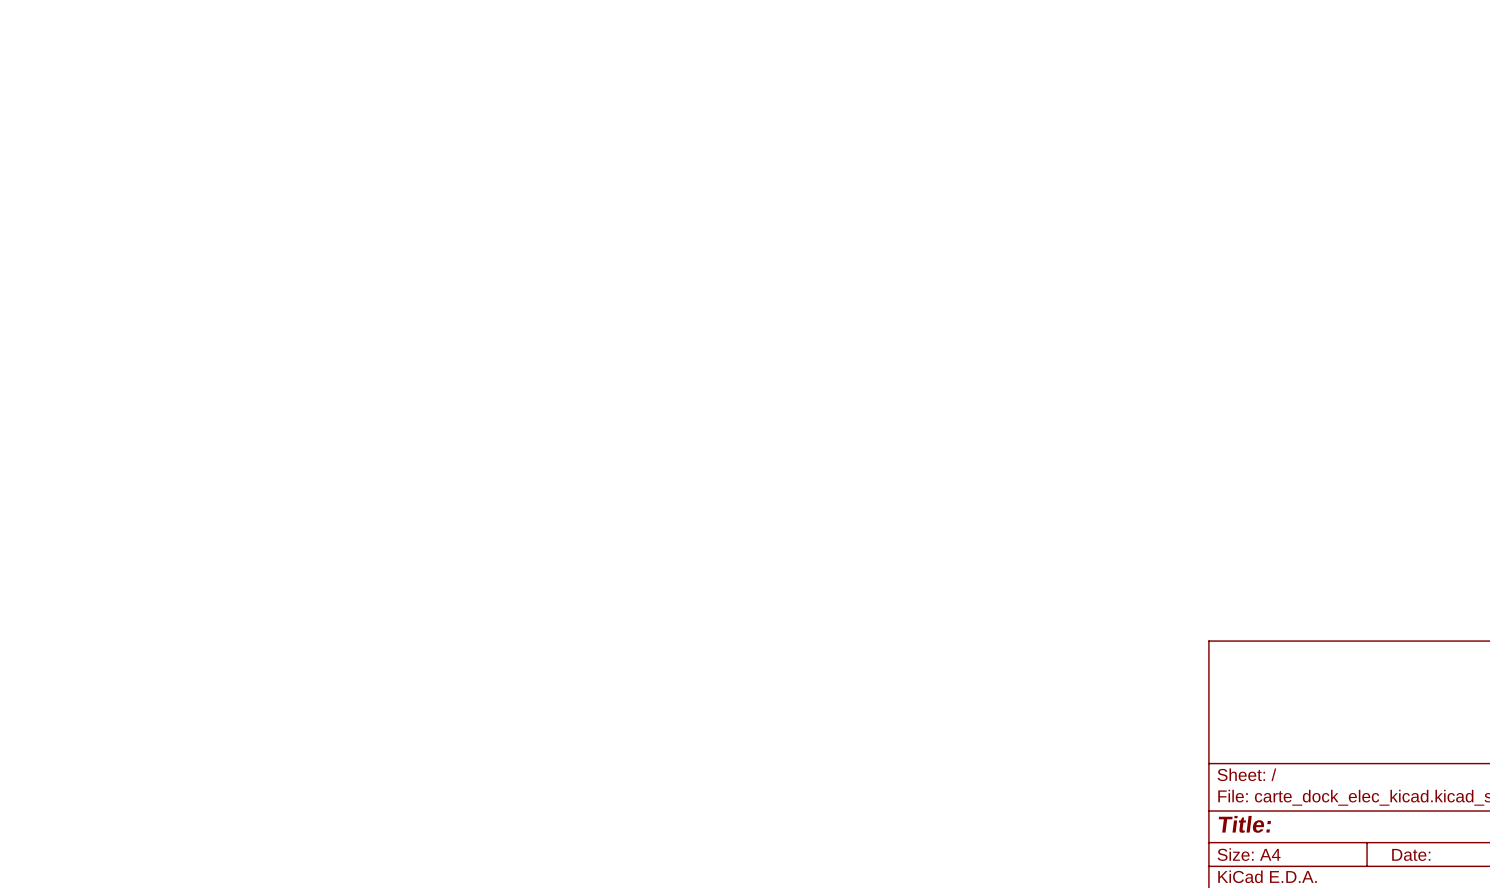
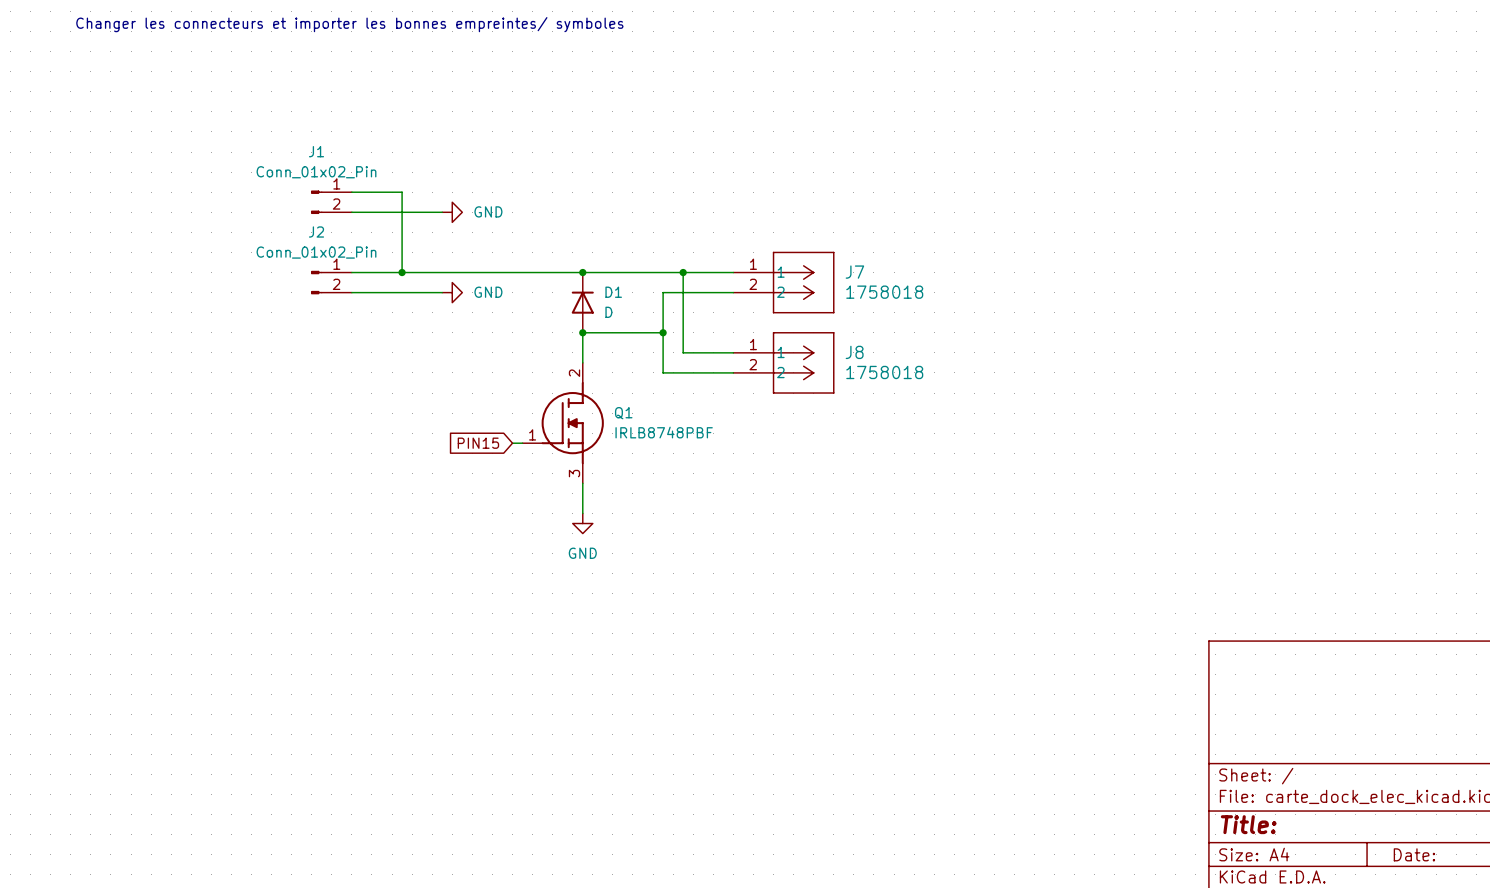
text: none -> Changer les connecteurs et importer les bonnes empreintes/ symboles (349, 24)
wire: none -> (351, 192) (402, 192) (402, 272)
J1: none -> Conn_01x02_Pin (331, 202)
wire: none -> (351, 212) (442, 212)
power symbol: none -> GND (452, 212)
wire: none -> (351, 272) (733, 272)
junction: none -> (402, 272)
junction: none -> (582, 272)
wire: none -> (683, 272) (683, 352) (733, 352)
junction: none -> (683, 272)
J2: none -> Conn_01x02_Pin (331, 282)
J7: none -> 1758018 (783, 282)
wire: none -> (351, 292) (442, 292)
power symbol: none -> GND (452, 292)
wire: none -> (733, 292) (663, 292) (663, 372) (733, 372)
D1: none -> D (582, 302)
junction: none -> (582, 332)
wire: none -> (663, 332) (582, 332) (582, 362)
junction: none -> (663, 332)
J8: none -> 1758018 (783, 362)
Q1: none -> IRLB8748PBF (563, 423)
global label: none -> PIN15 (478, 443)
wire: none -> (512, 443) (522, 443)
wire: none -> (582, 483) (582, 513)
power symbol: none -> GND (582, 523)

